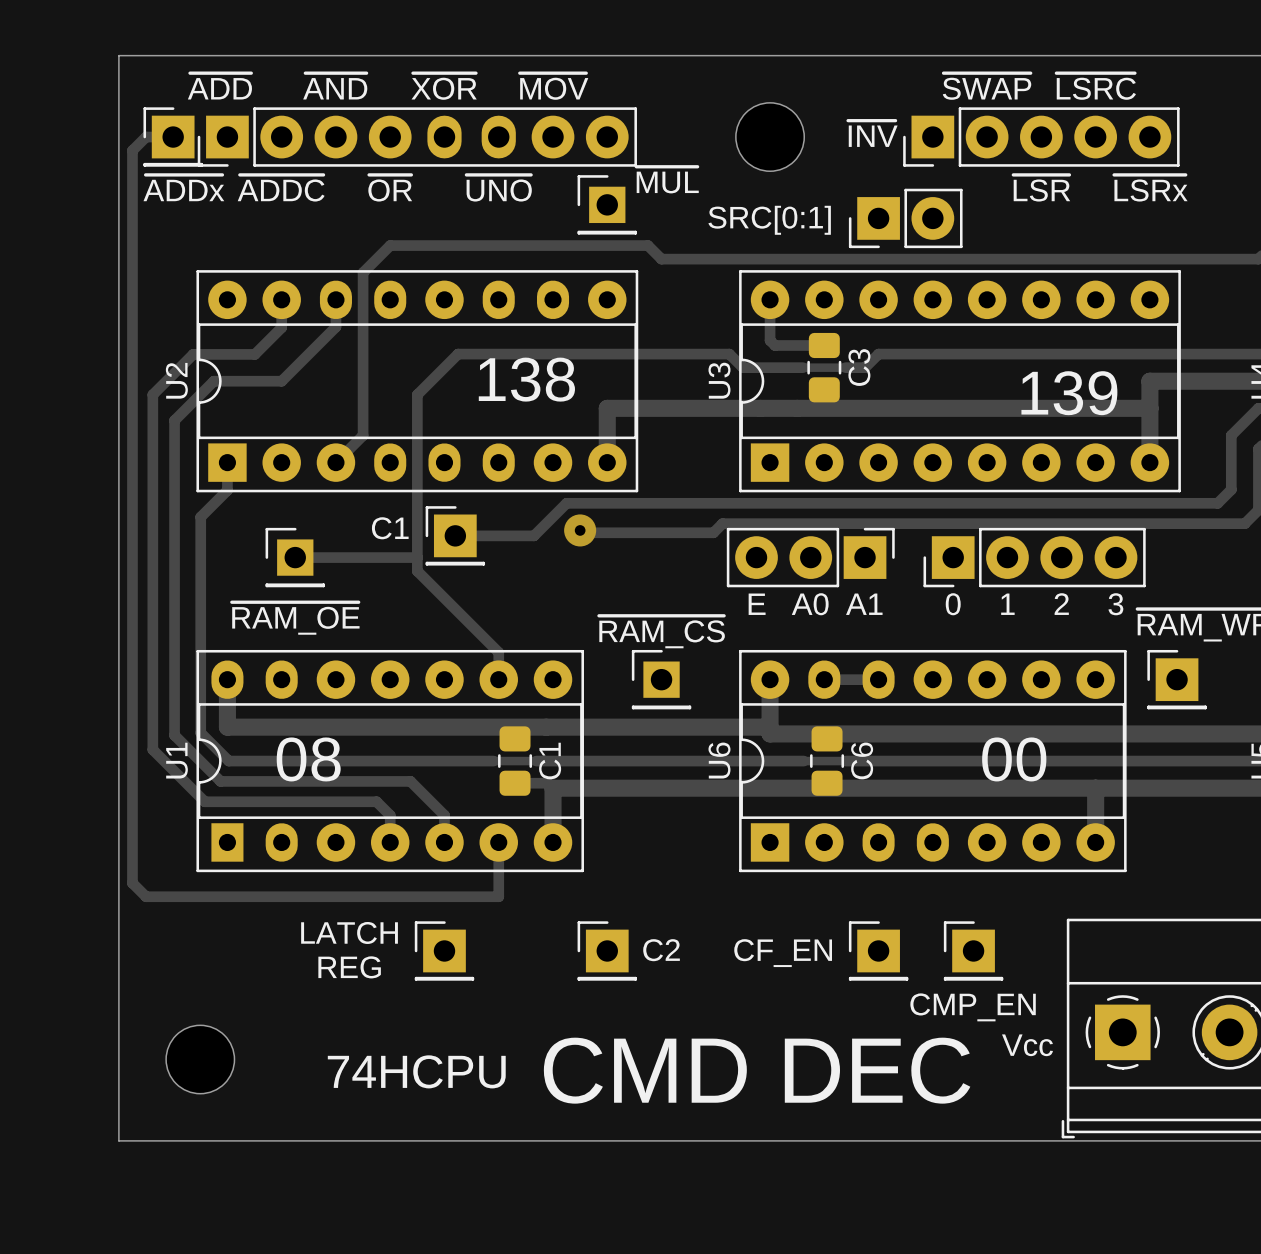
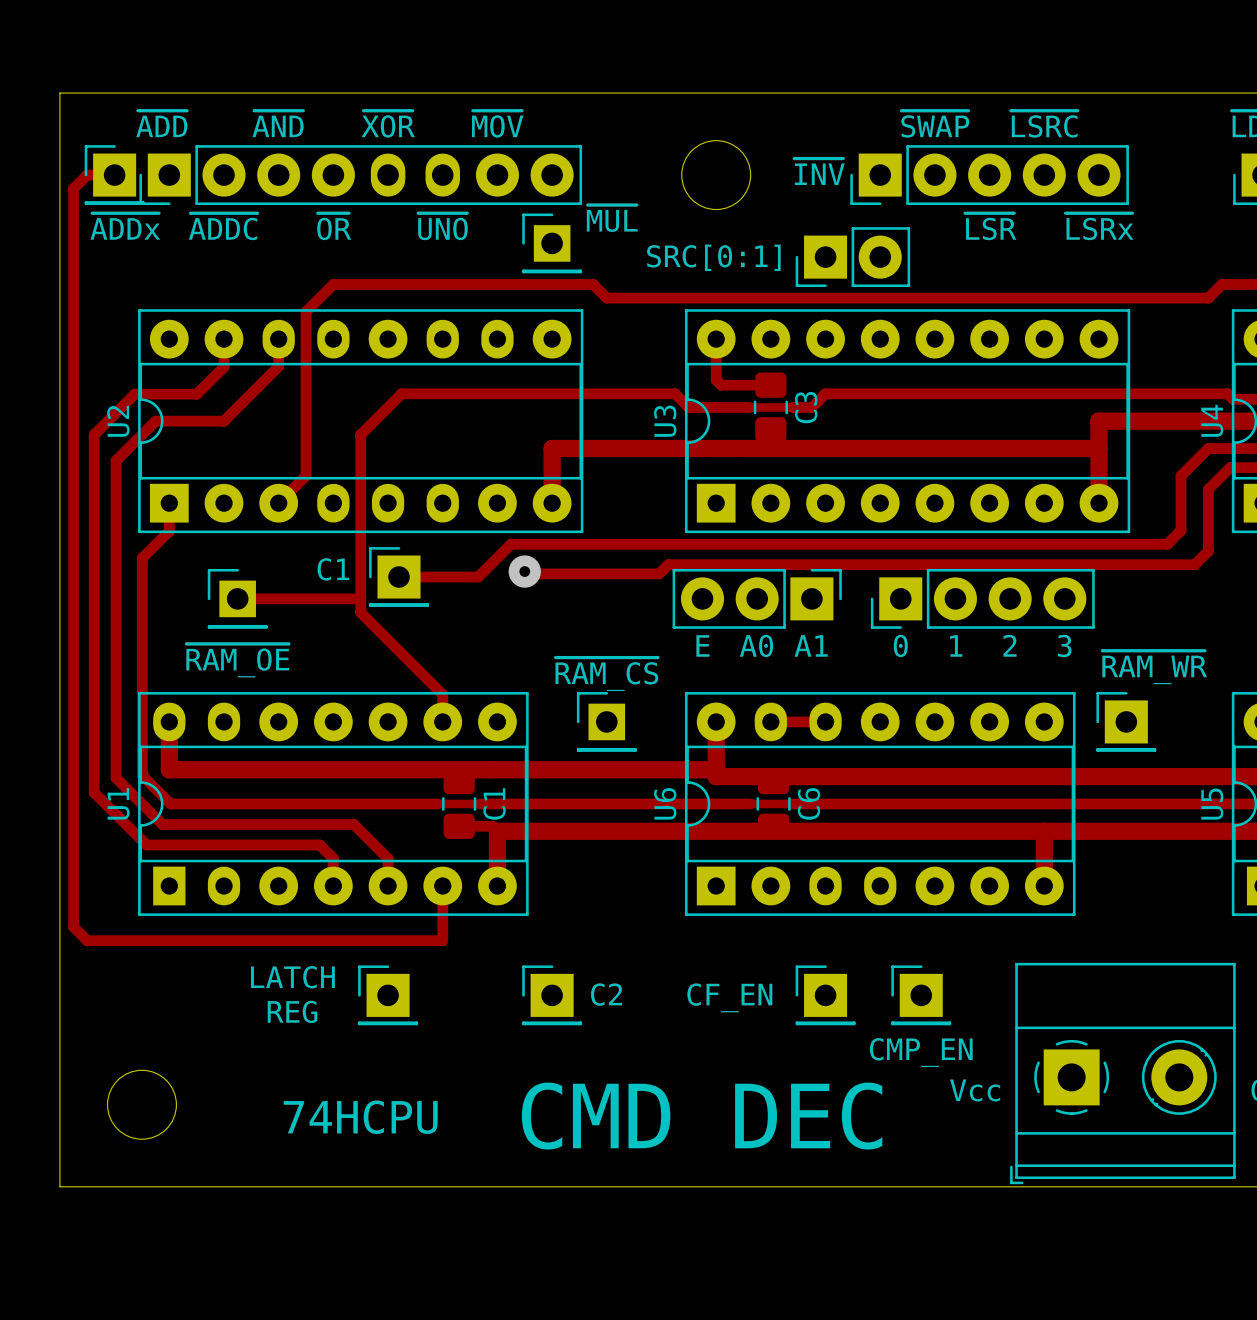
text: 138 (526, 379) -> none
text: 139 (1069, 393) -> none
text: 08 (308, 759) -> none
text: 00 (1014, 759) -> none

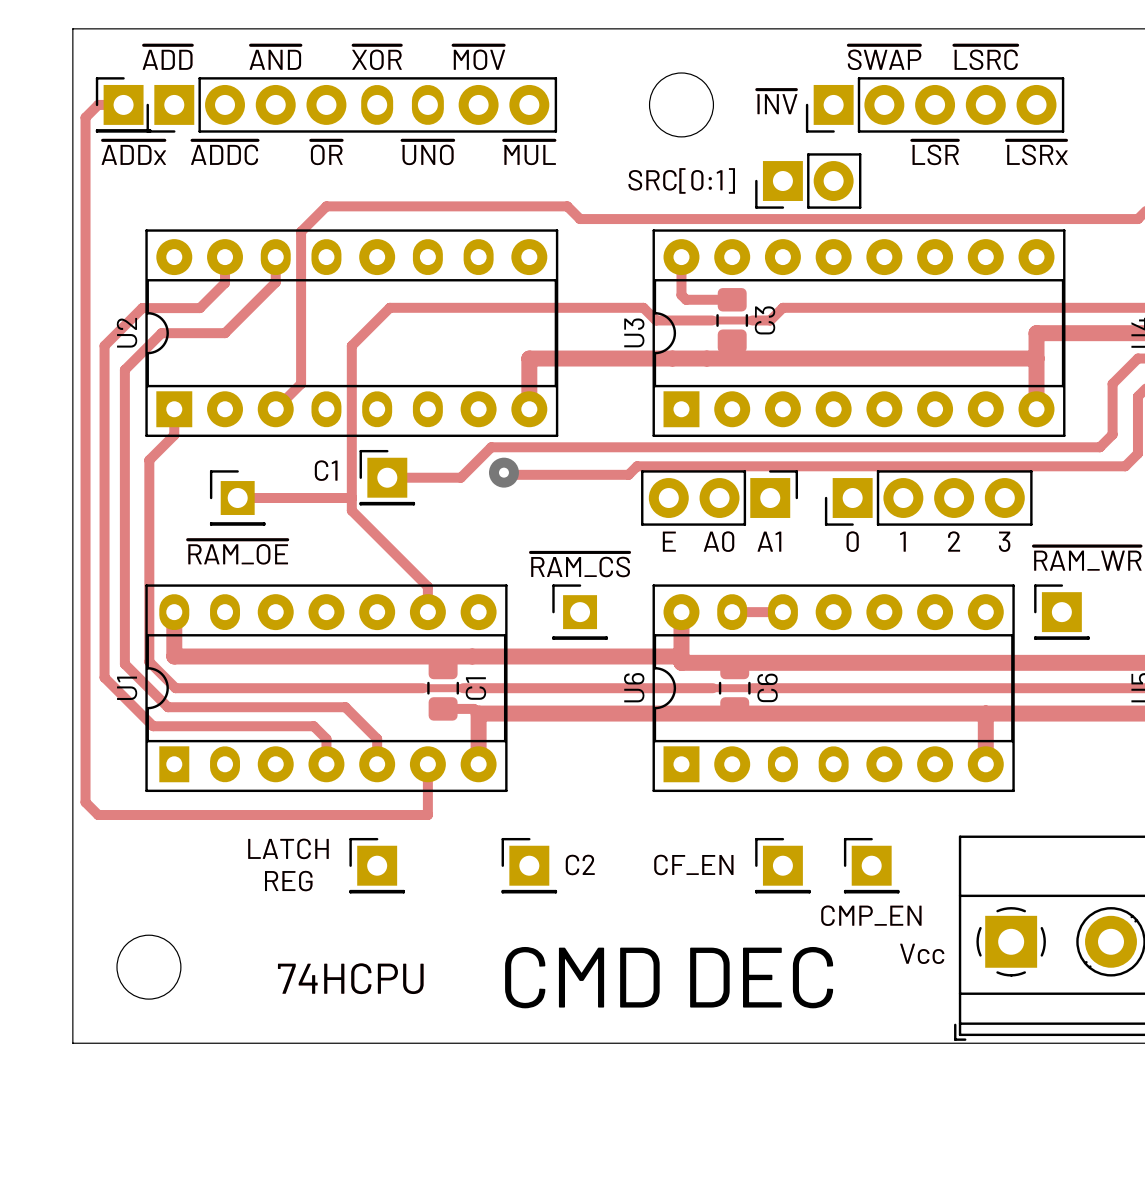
text: ~{MUL} (612, 218) -> none
text: none -> ~{MUL} (529, 152)
part: (552, 243) -> none

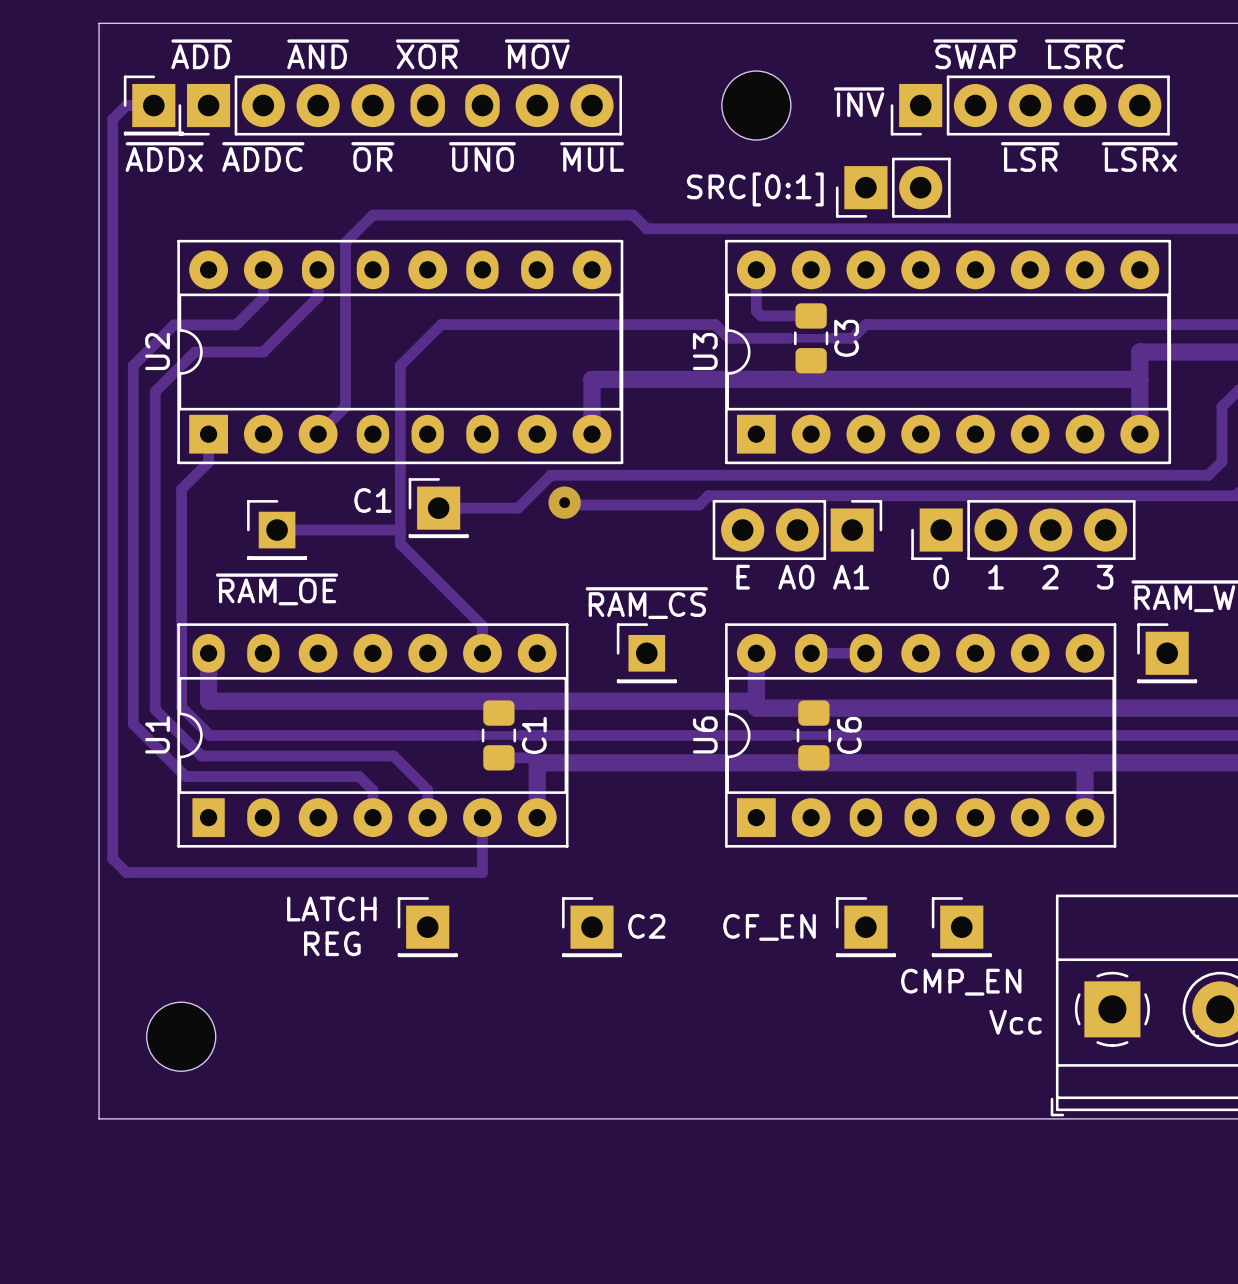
text: CMD DEC (669, 977) -> none
text: 74HCPU (350, 978) -> none

